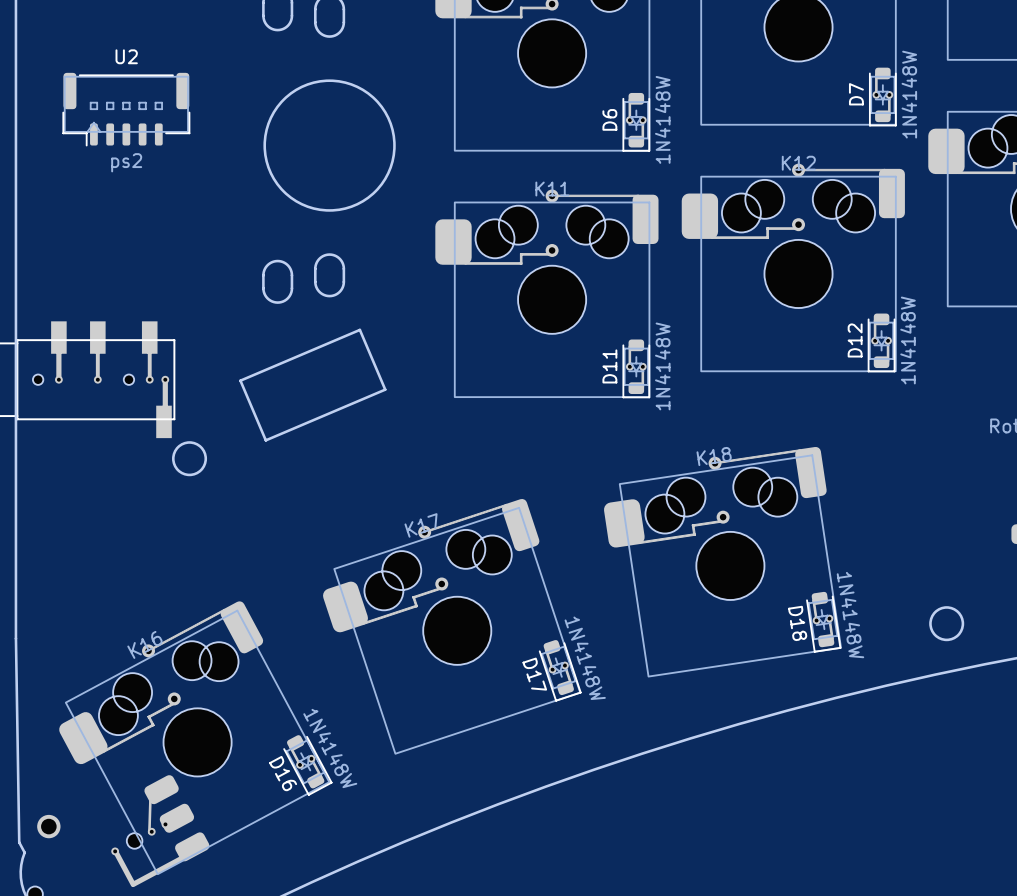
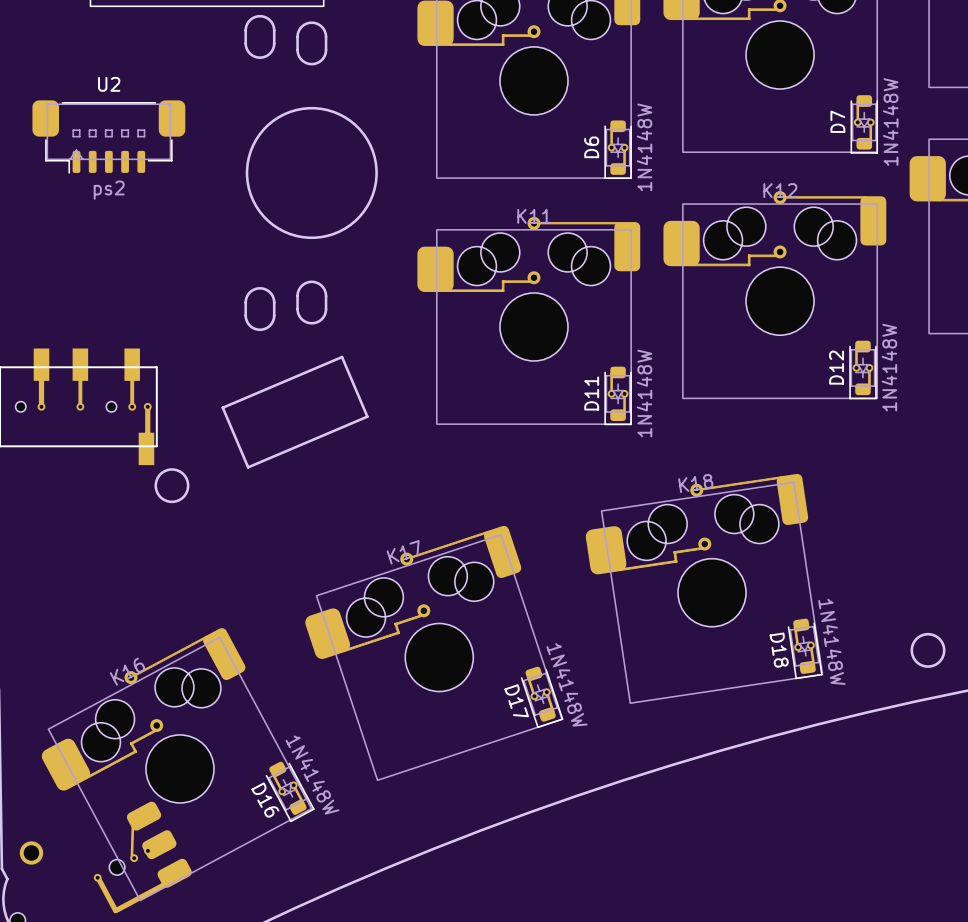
U2 footprint: [62, 72, 191, 147] -> [32, 100, 186, 174]

